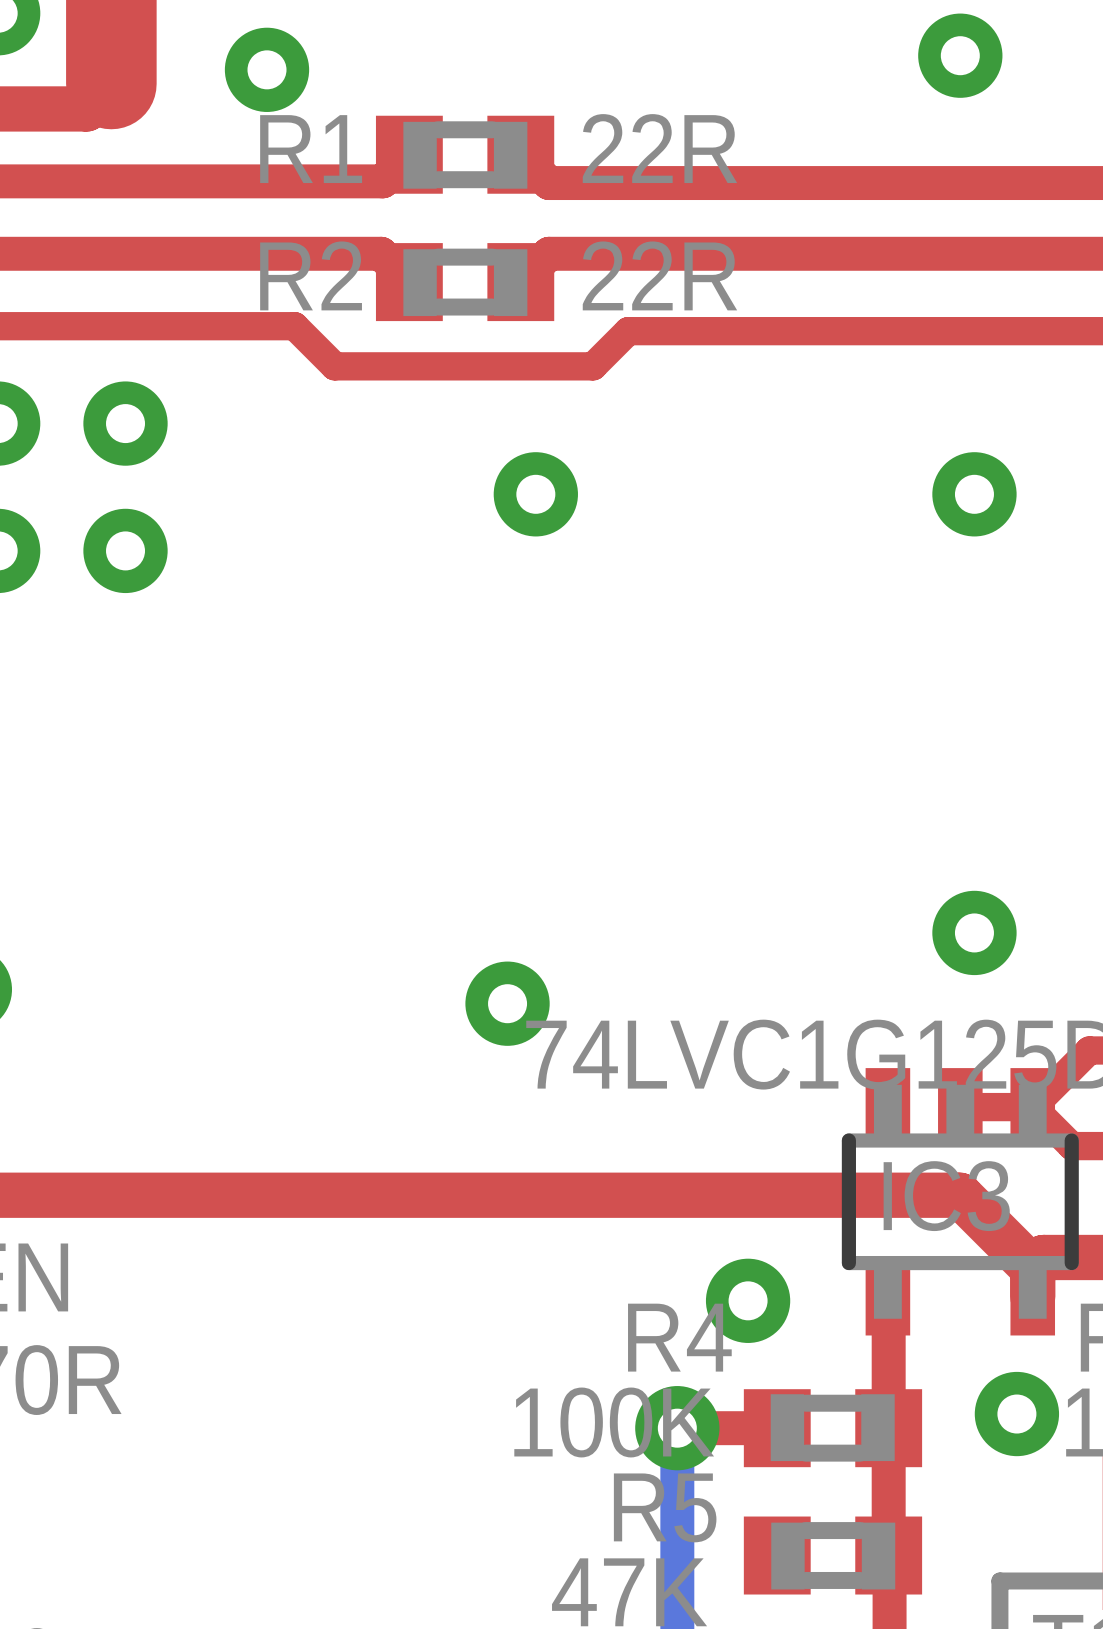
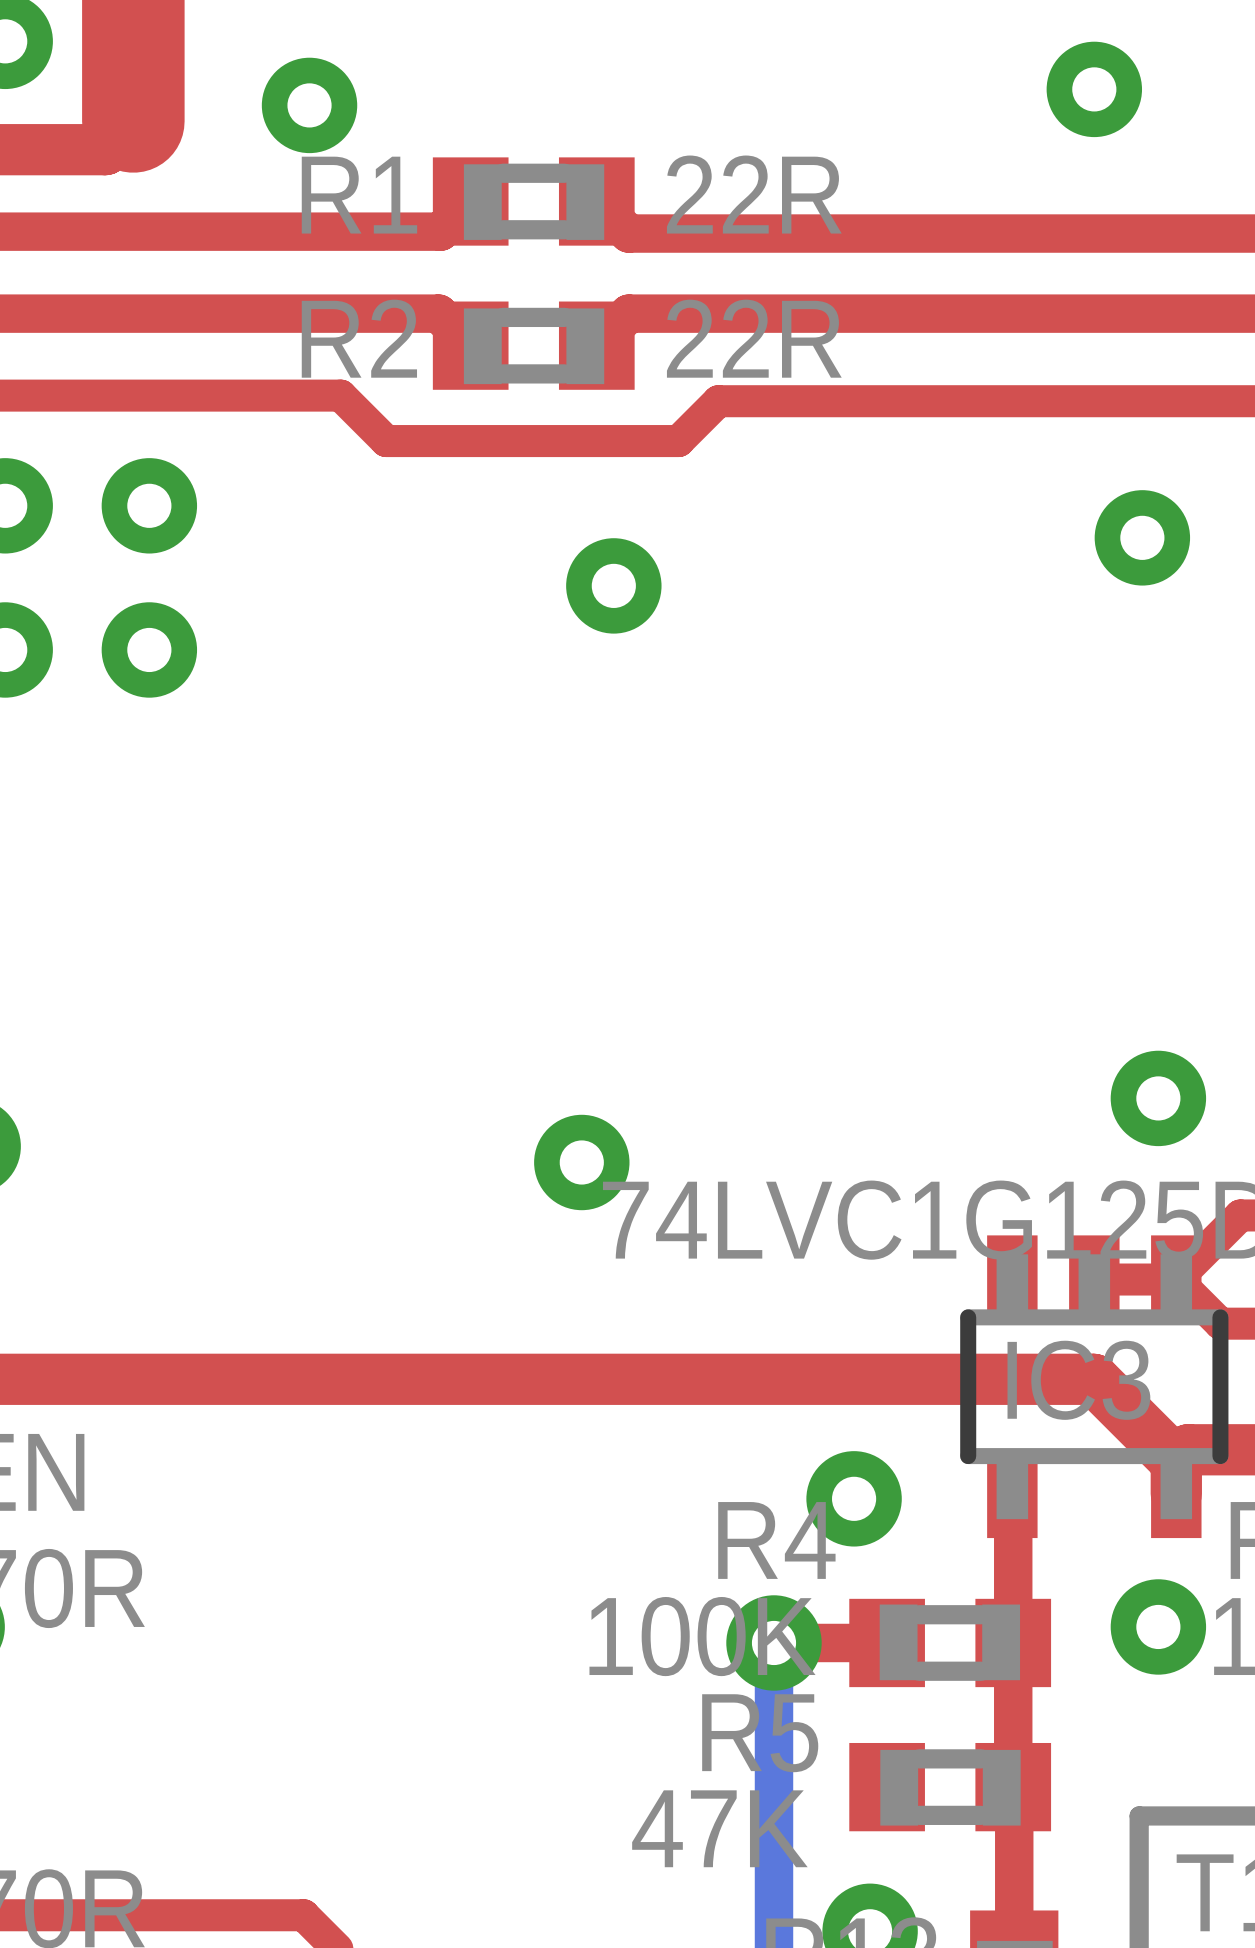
via position: (974, 494) -> (1142, 537)
via position: (974, 932) -> (1158, 1098)

